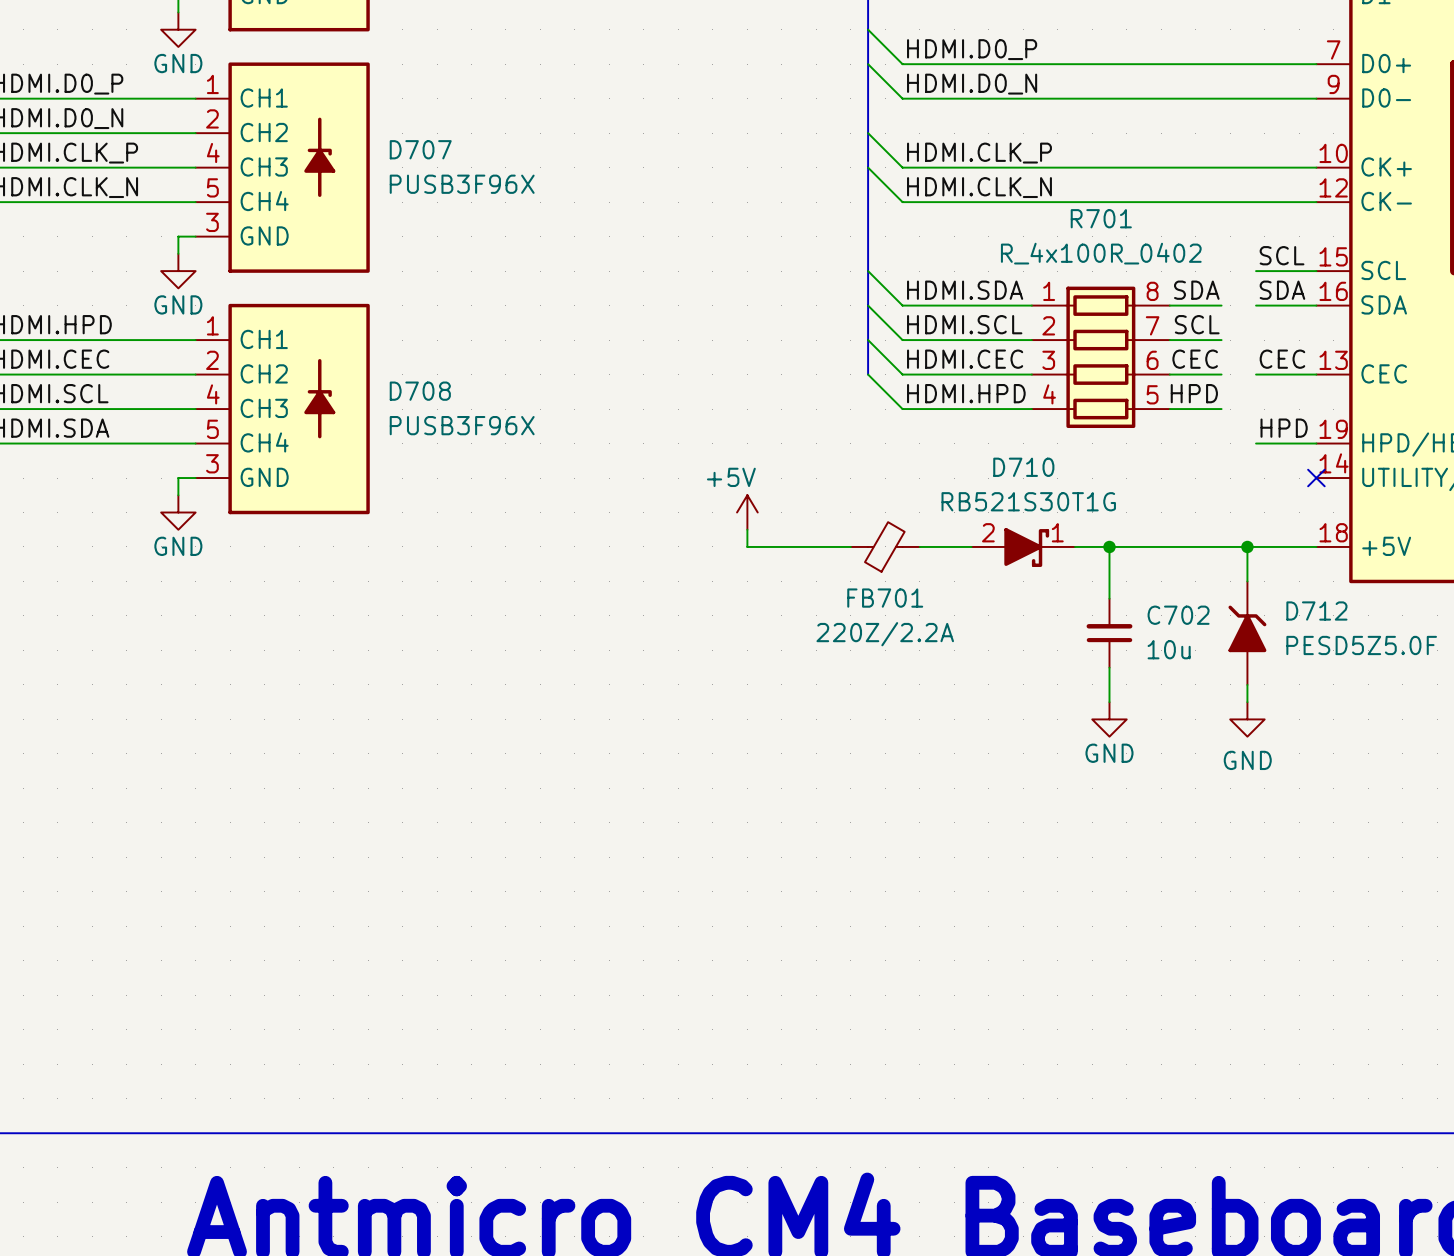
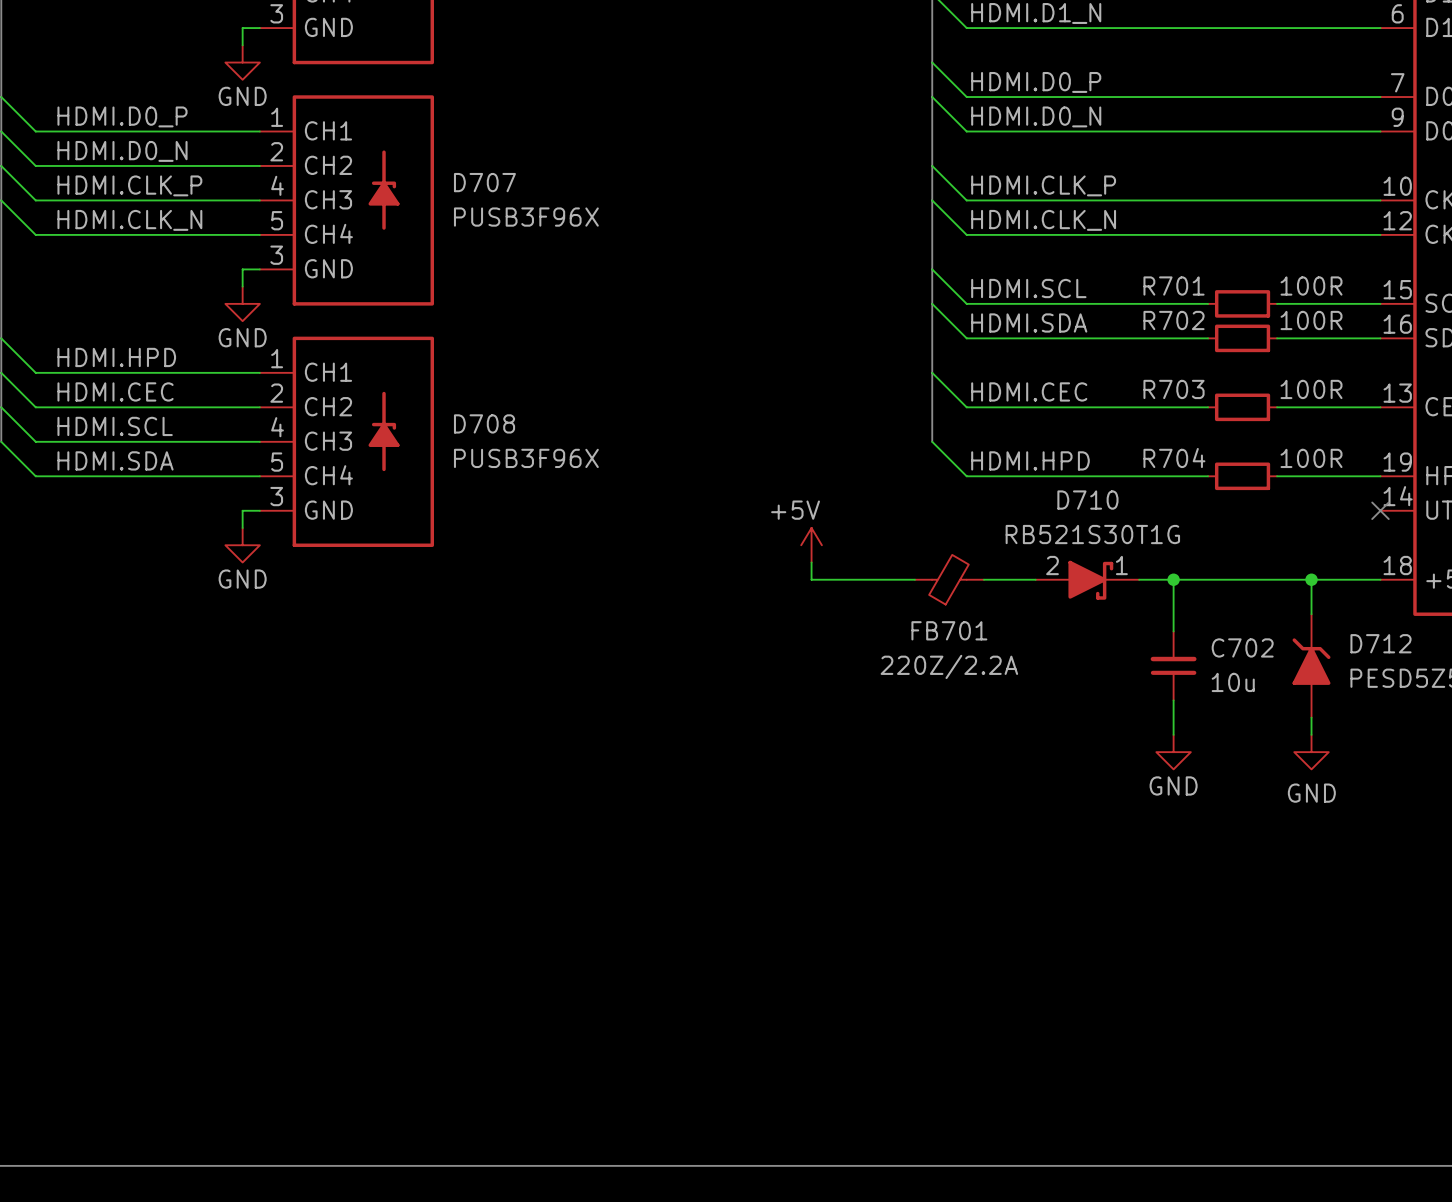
R701 name position: R701 (1101, 218) -> R701 (1174, 286)
wire: none -> (932, 269) (966, 303) (1208, 303)
R701 text: R_4x100R_0402 (1101, 253) -> 100R (1311, 286)
label: SCL (1282, 255) -> none
R701 symbol: [1031, 286, 1170, 429] -> [1208, 290, 1278, 318]
label: SDA (1196, 290) -> none
label: SDA (1282, 290) -> none
wire: (868, 305) (902, 340) (1031, 340) -> none
wire: (1169, 305) (1212, 305) -> (1277, 303) (1320, 303)
R702: none -> (1242, 338)
wire: none -> (1285, 338) (1320, 338)
label position: HDMI.SCL (964, 324) -> HDMI.SCL (1028, 288)
label: SCL (1197, 324) -> none
wire: (1169, 340) (1221, 340) -> none
label: CEC (1195, 359) -> none
label: CEC (1282, 359) -> none
wire: (868, 374) (902, 409) (1031, 409) -> none
bus: none -> (932, 407) (932, 441)
wire: (1169, 374) (1212, 374) -> (1277, 476) (1320, 476)
R703: none -> (1242, 407)
wire: none -> (1285, 407) (1320, 407)
label position: HDMI.HPD (966, 393) -> HDMI.HPD (1030, 460)
label: HPD (1194, 393) -> none
wire: none -> (932, 441) (966, 476) (1208, 476)
wire: (1169, 409) (1221, 409) -> none
label: HPD (1284, 428) -> none
R704: none -> (1242, 476)

